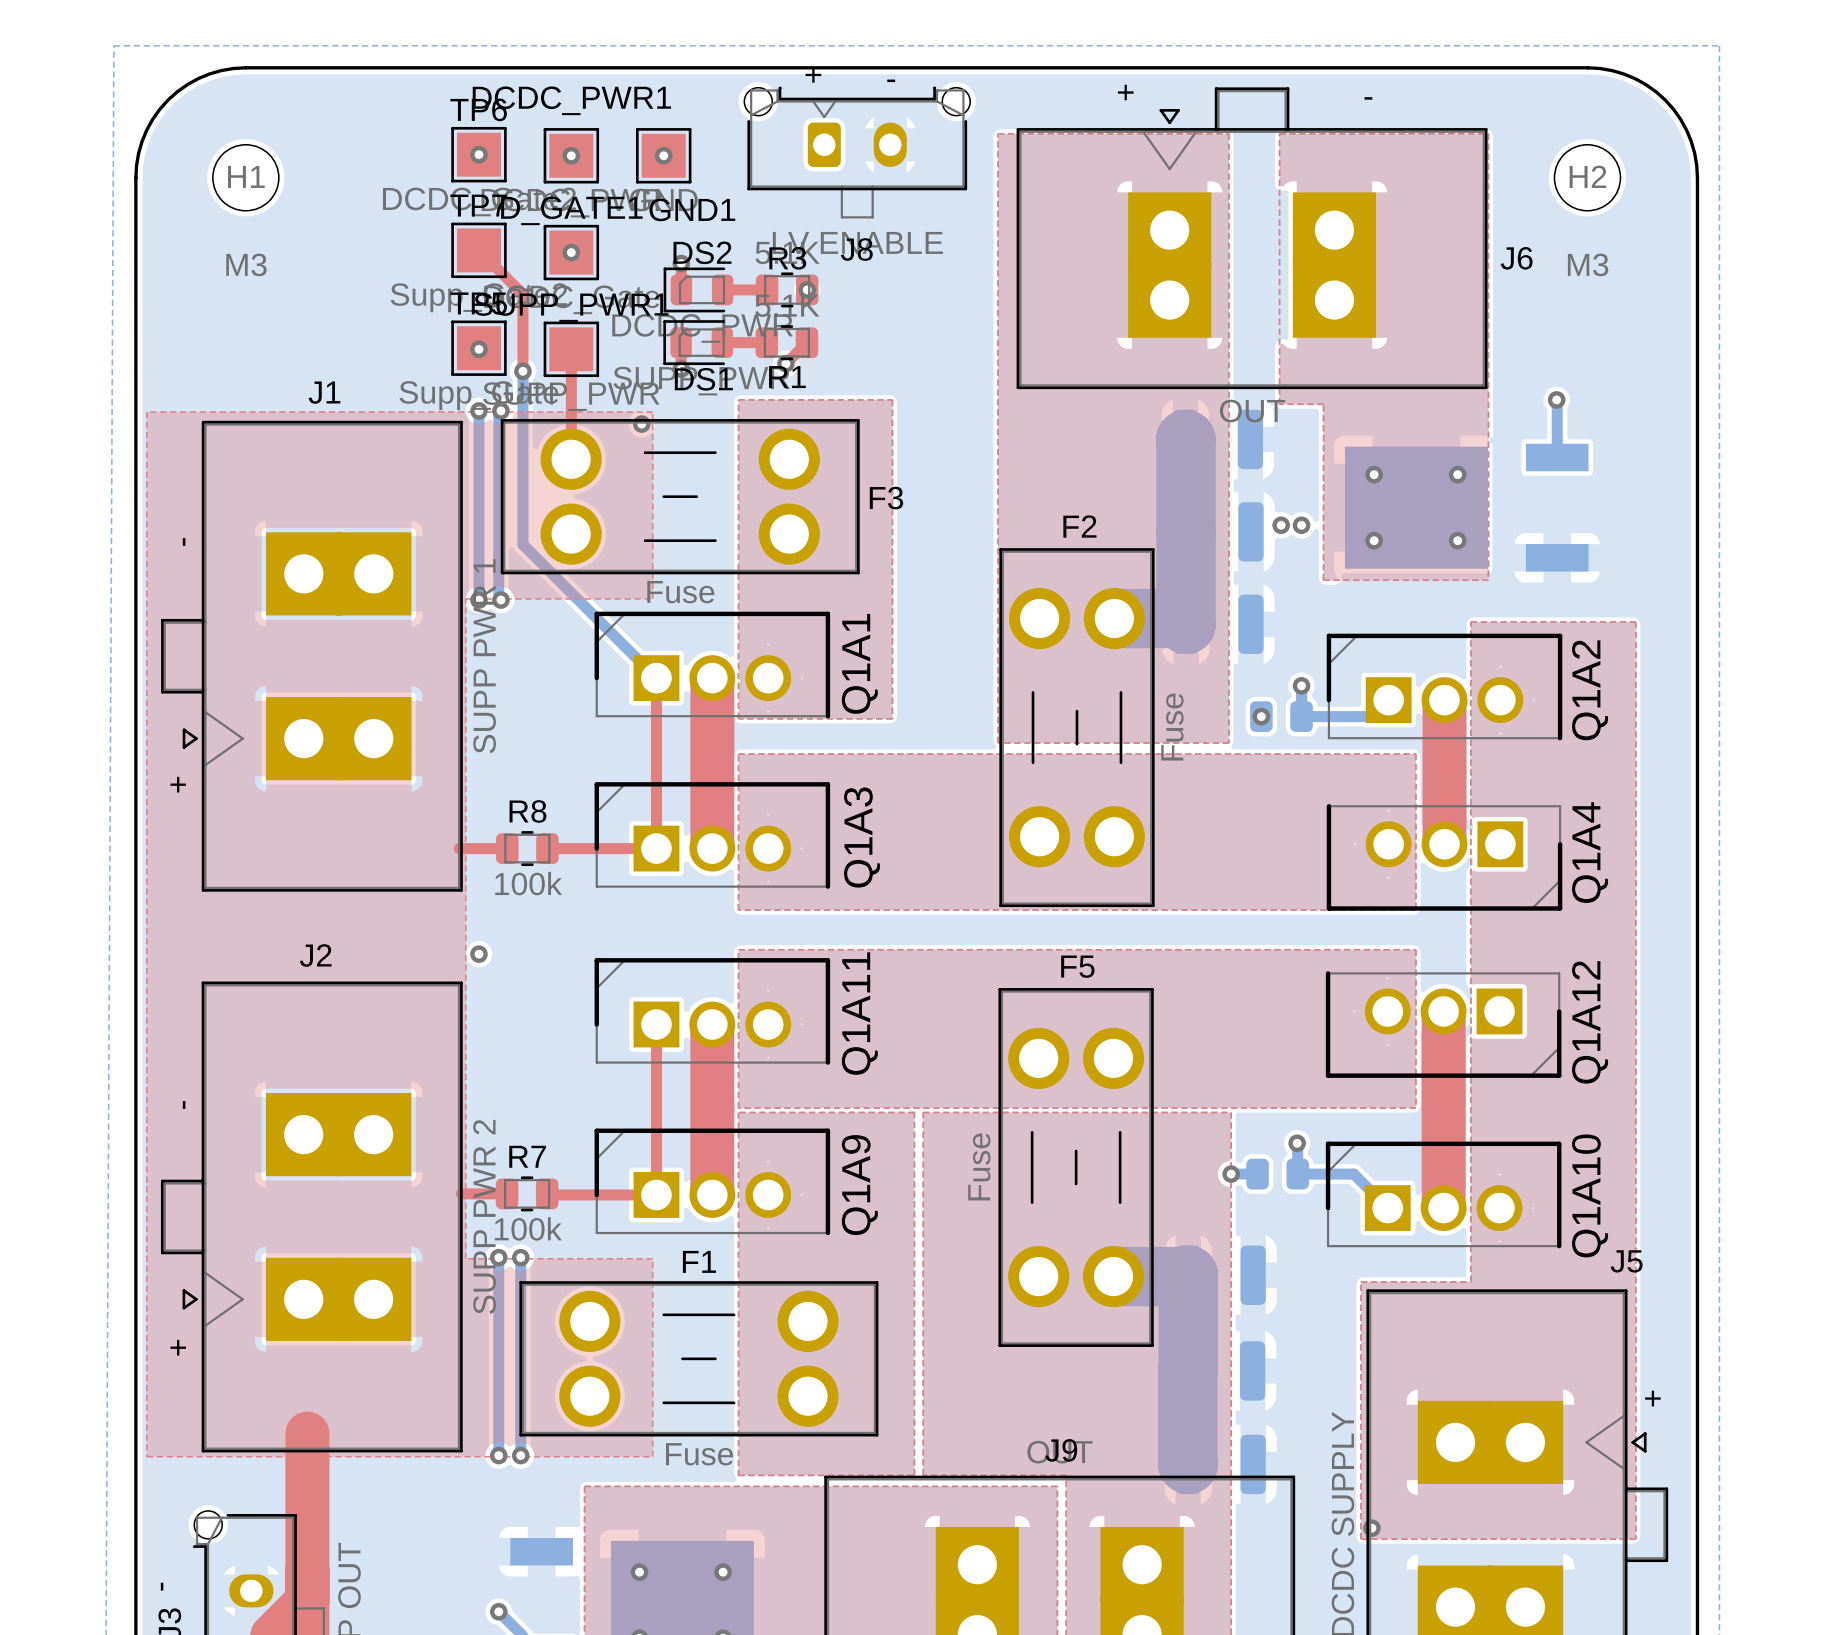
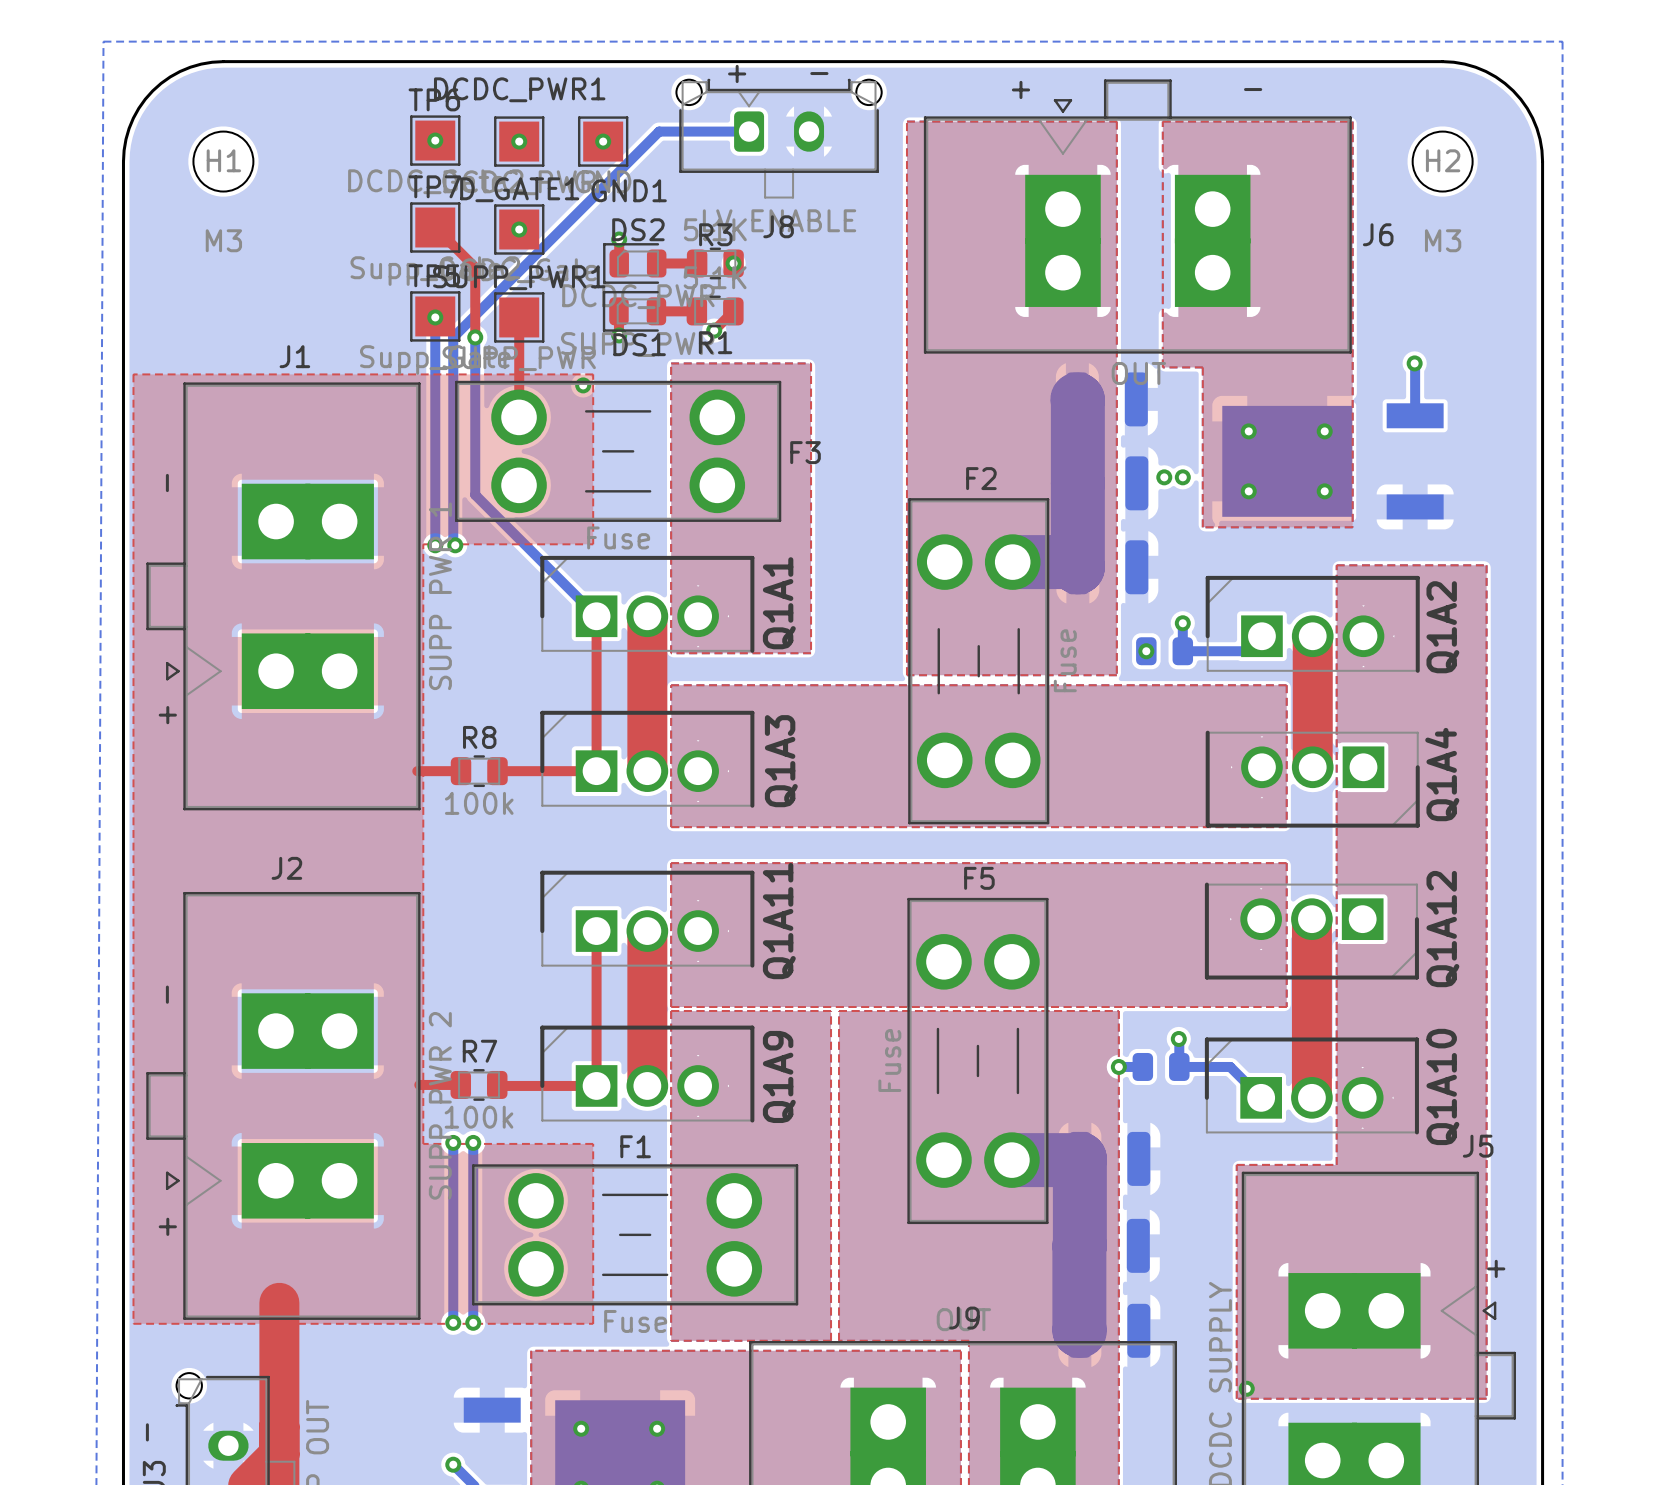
bottom track: none -> (749, 131) (659, 131) (453, 337) (453, 375)
bottom track: none -> (435, 317) (435, 373)
via: (478, 410) -> none
via: (500, 410) -> none
via: (478, 954) -> none

